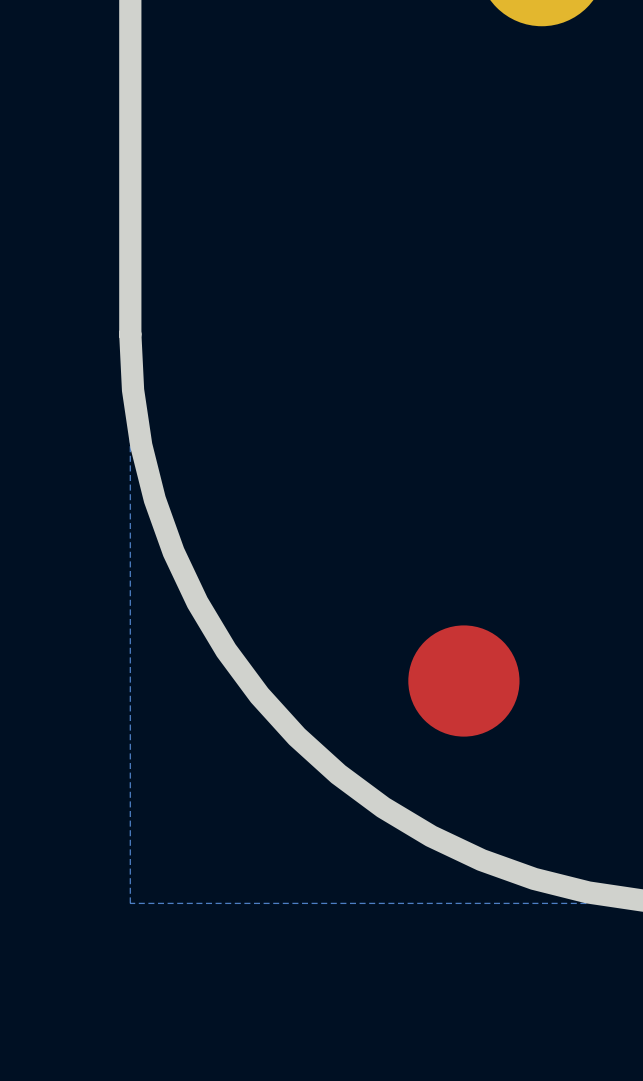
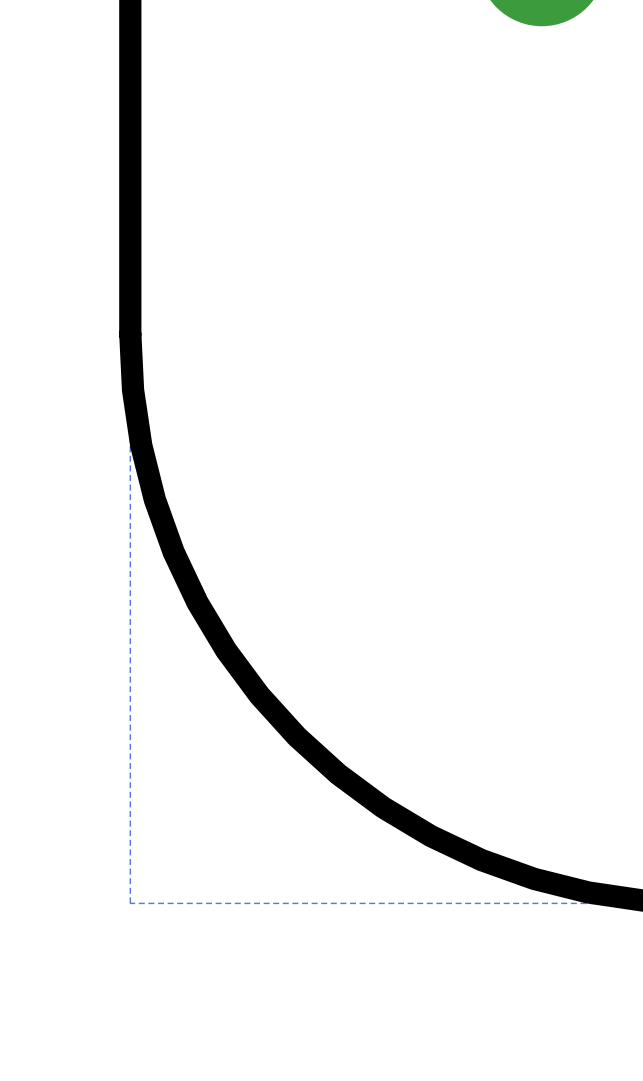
part: (463, 681) -> none

